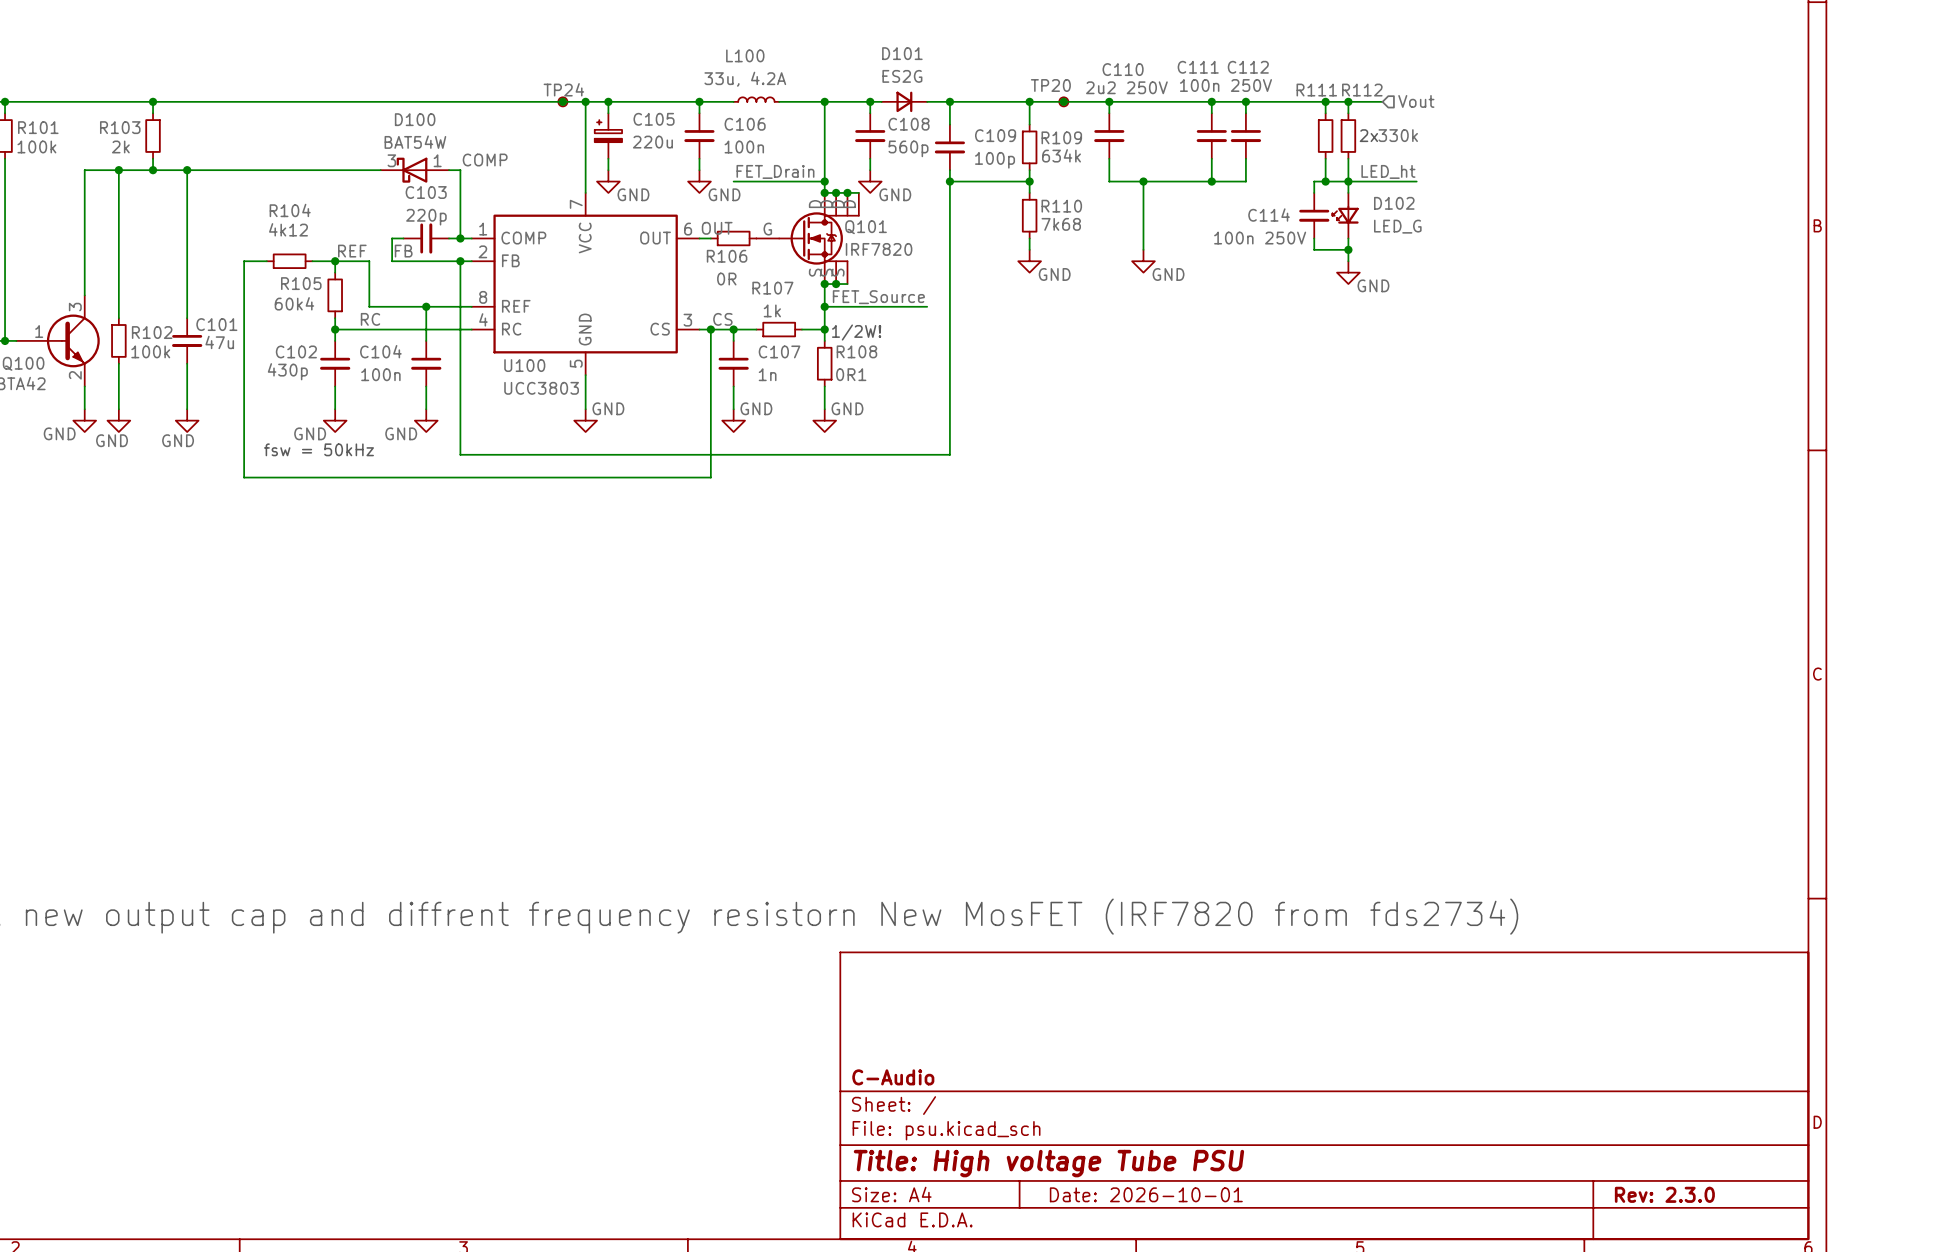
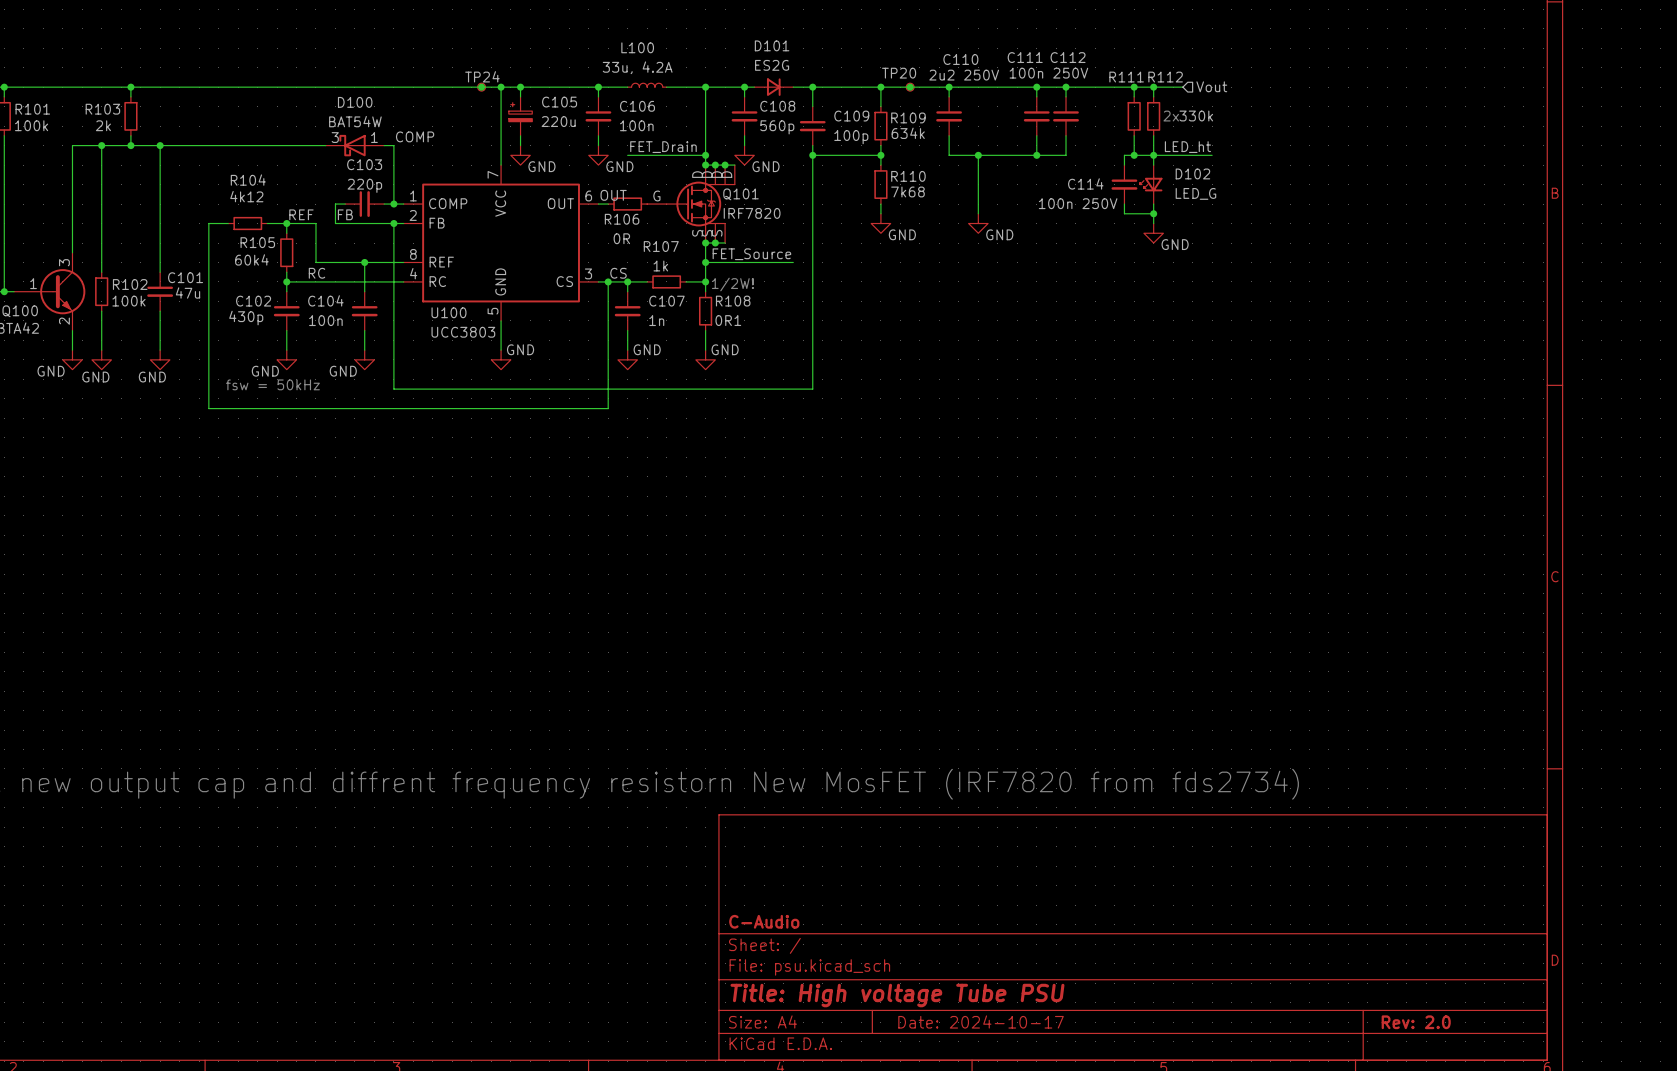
title block: Date: 2026-10-01 (1146, 1194) -> Date: 2024-10-17 (981, 1021)
title block: Rev: 2.3.0 (1664, 1194) -> Rev: 2.0 (1416, 1022)

